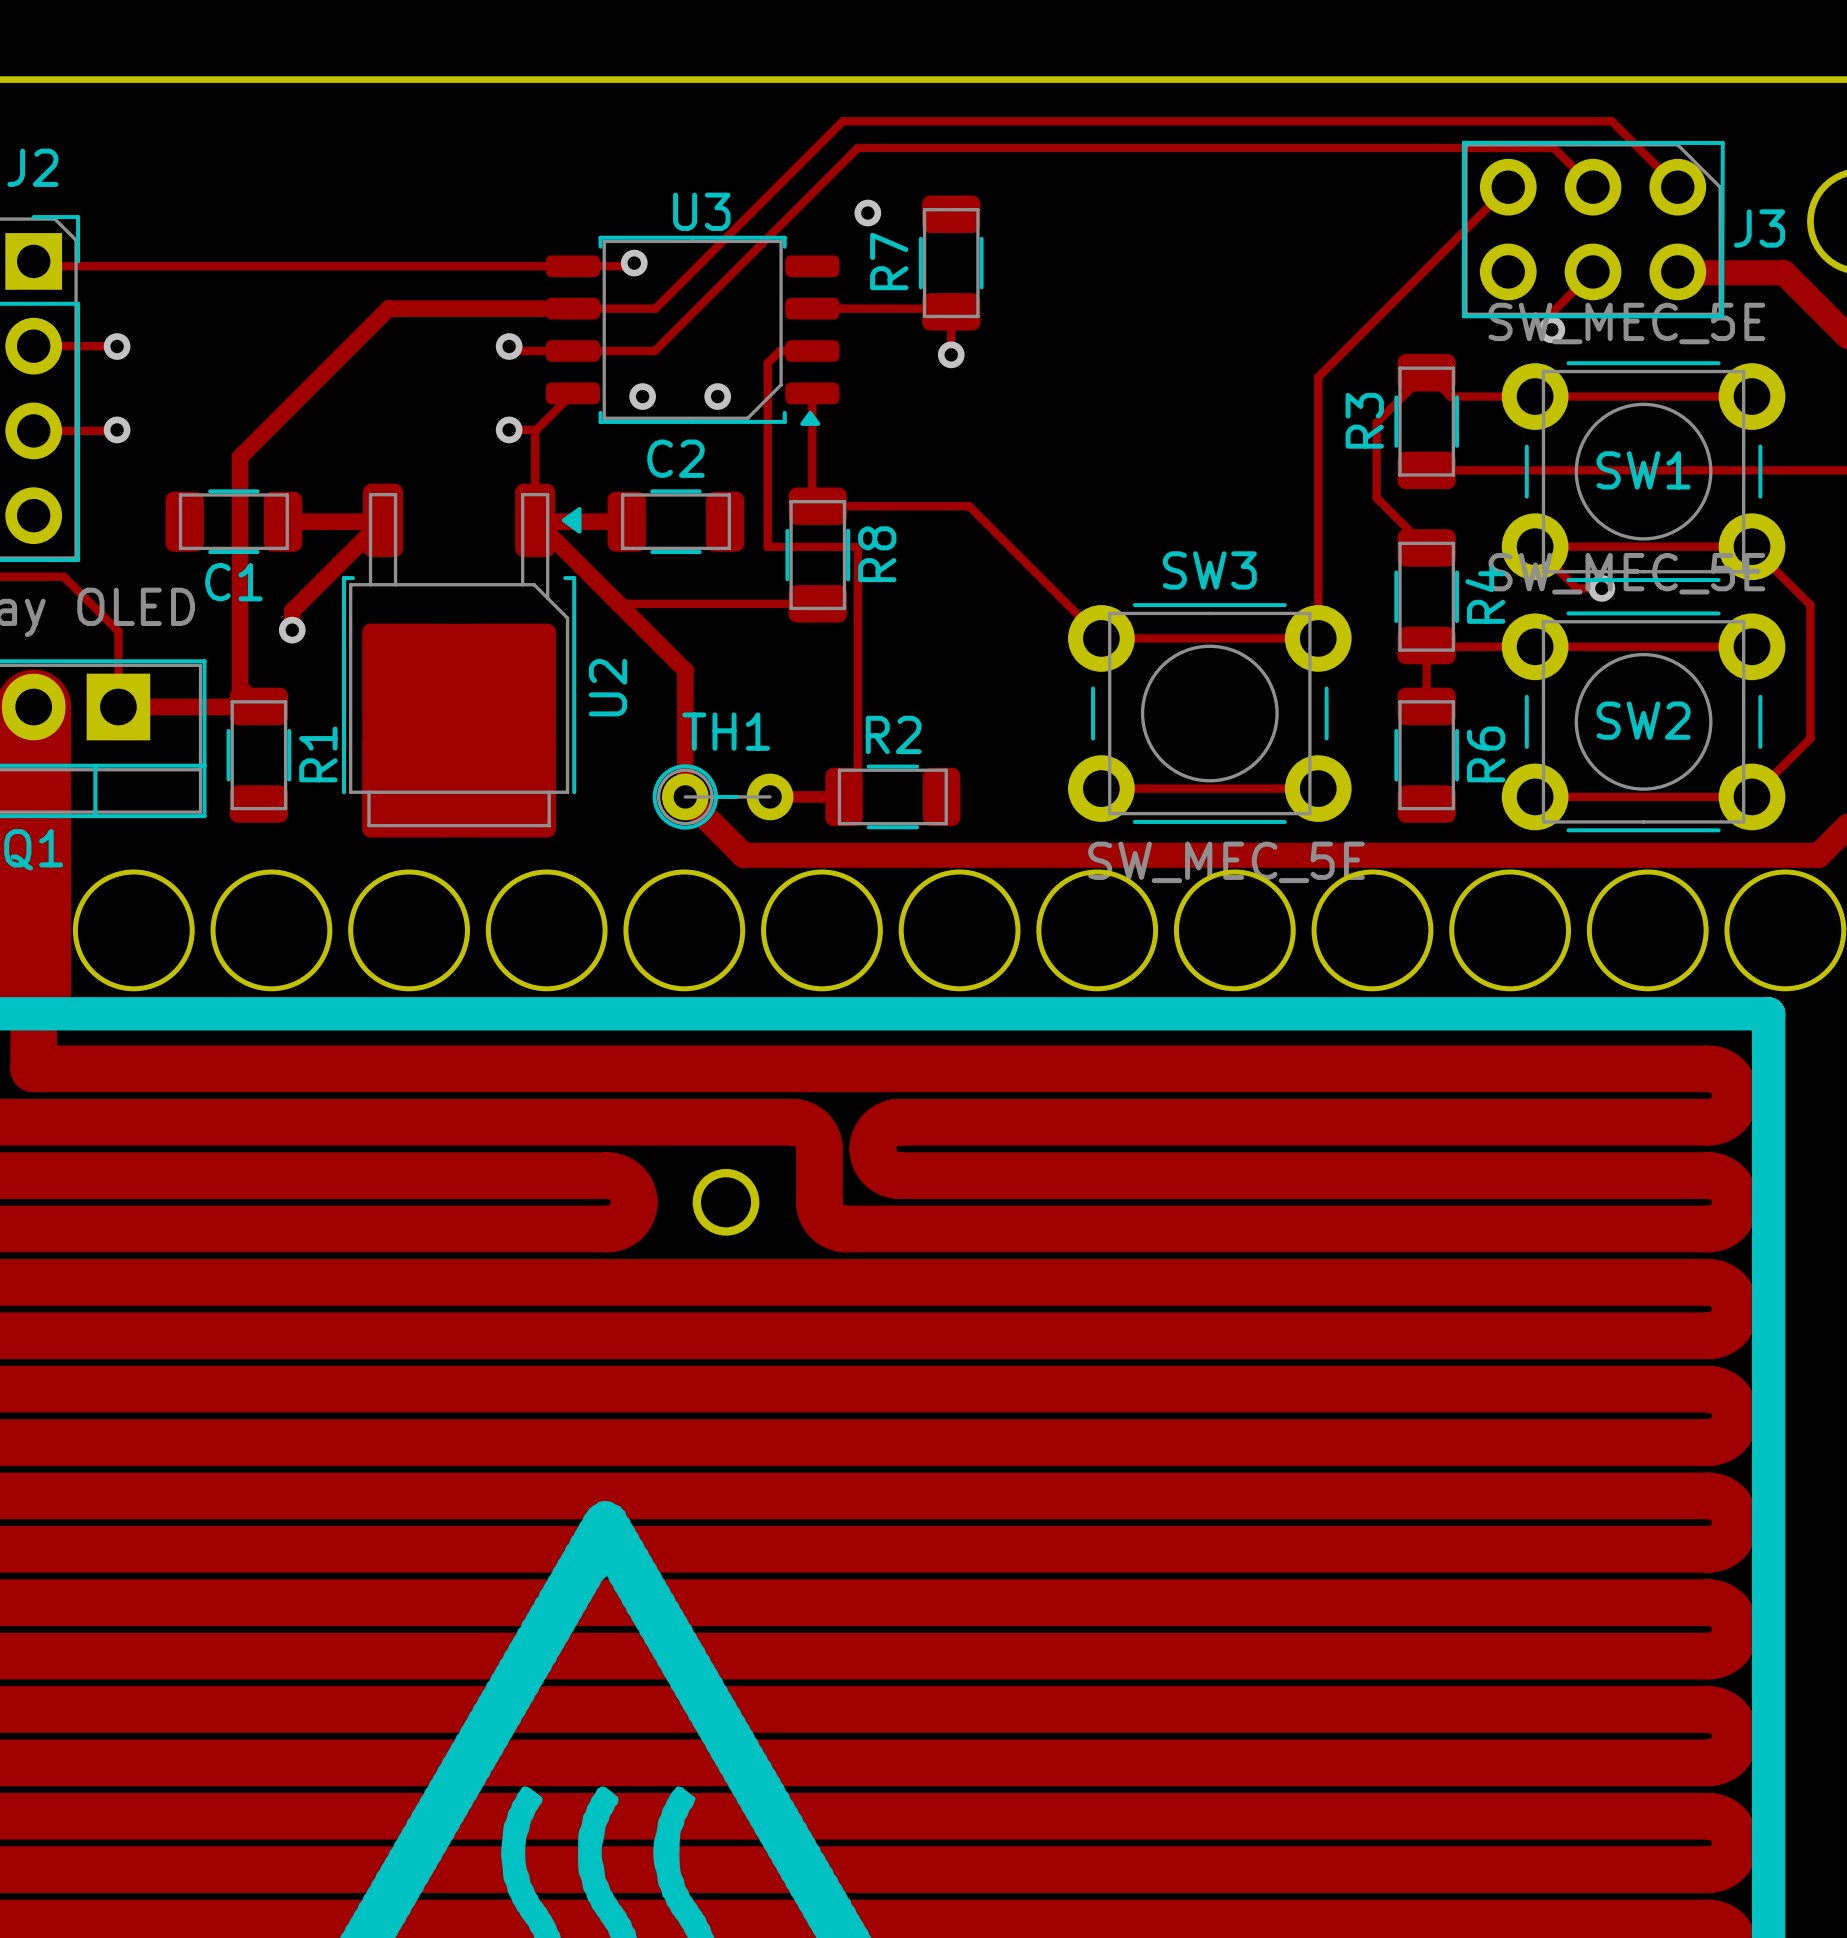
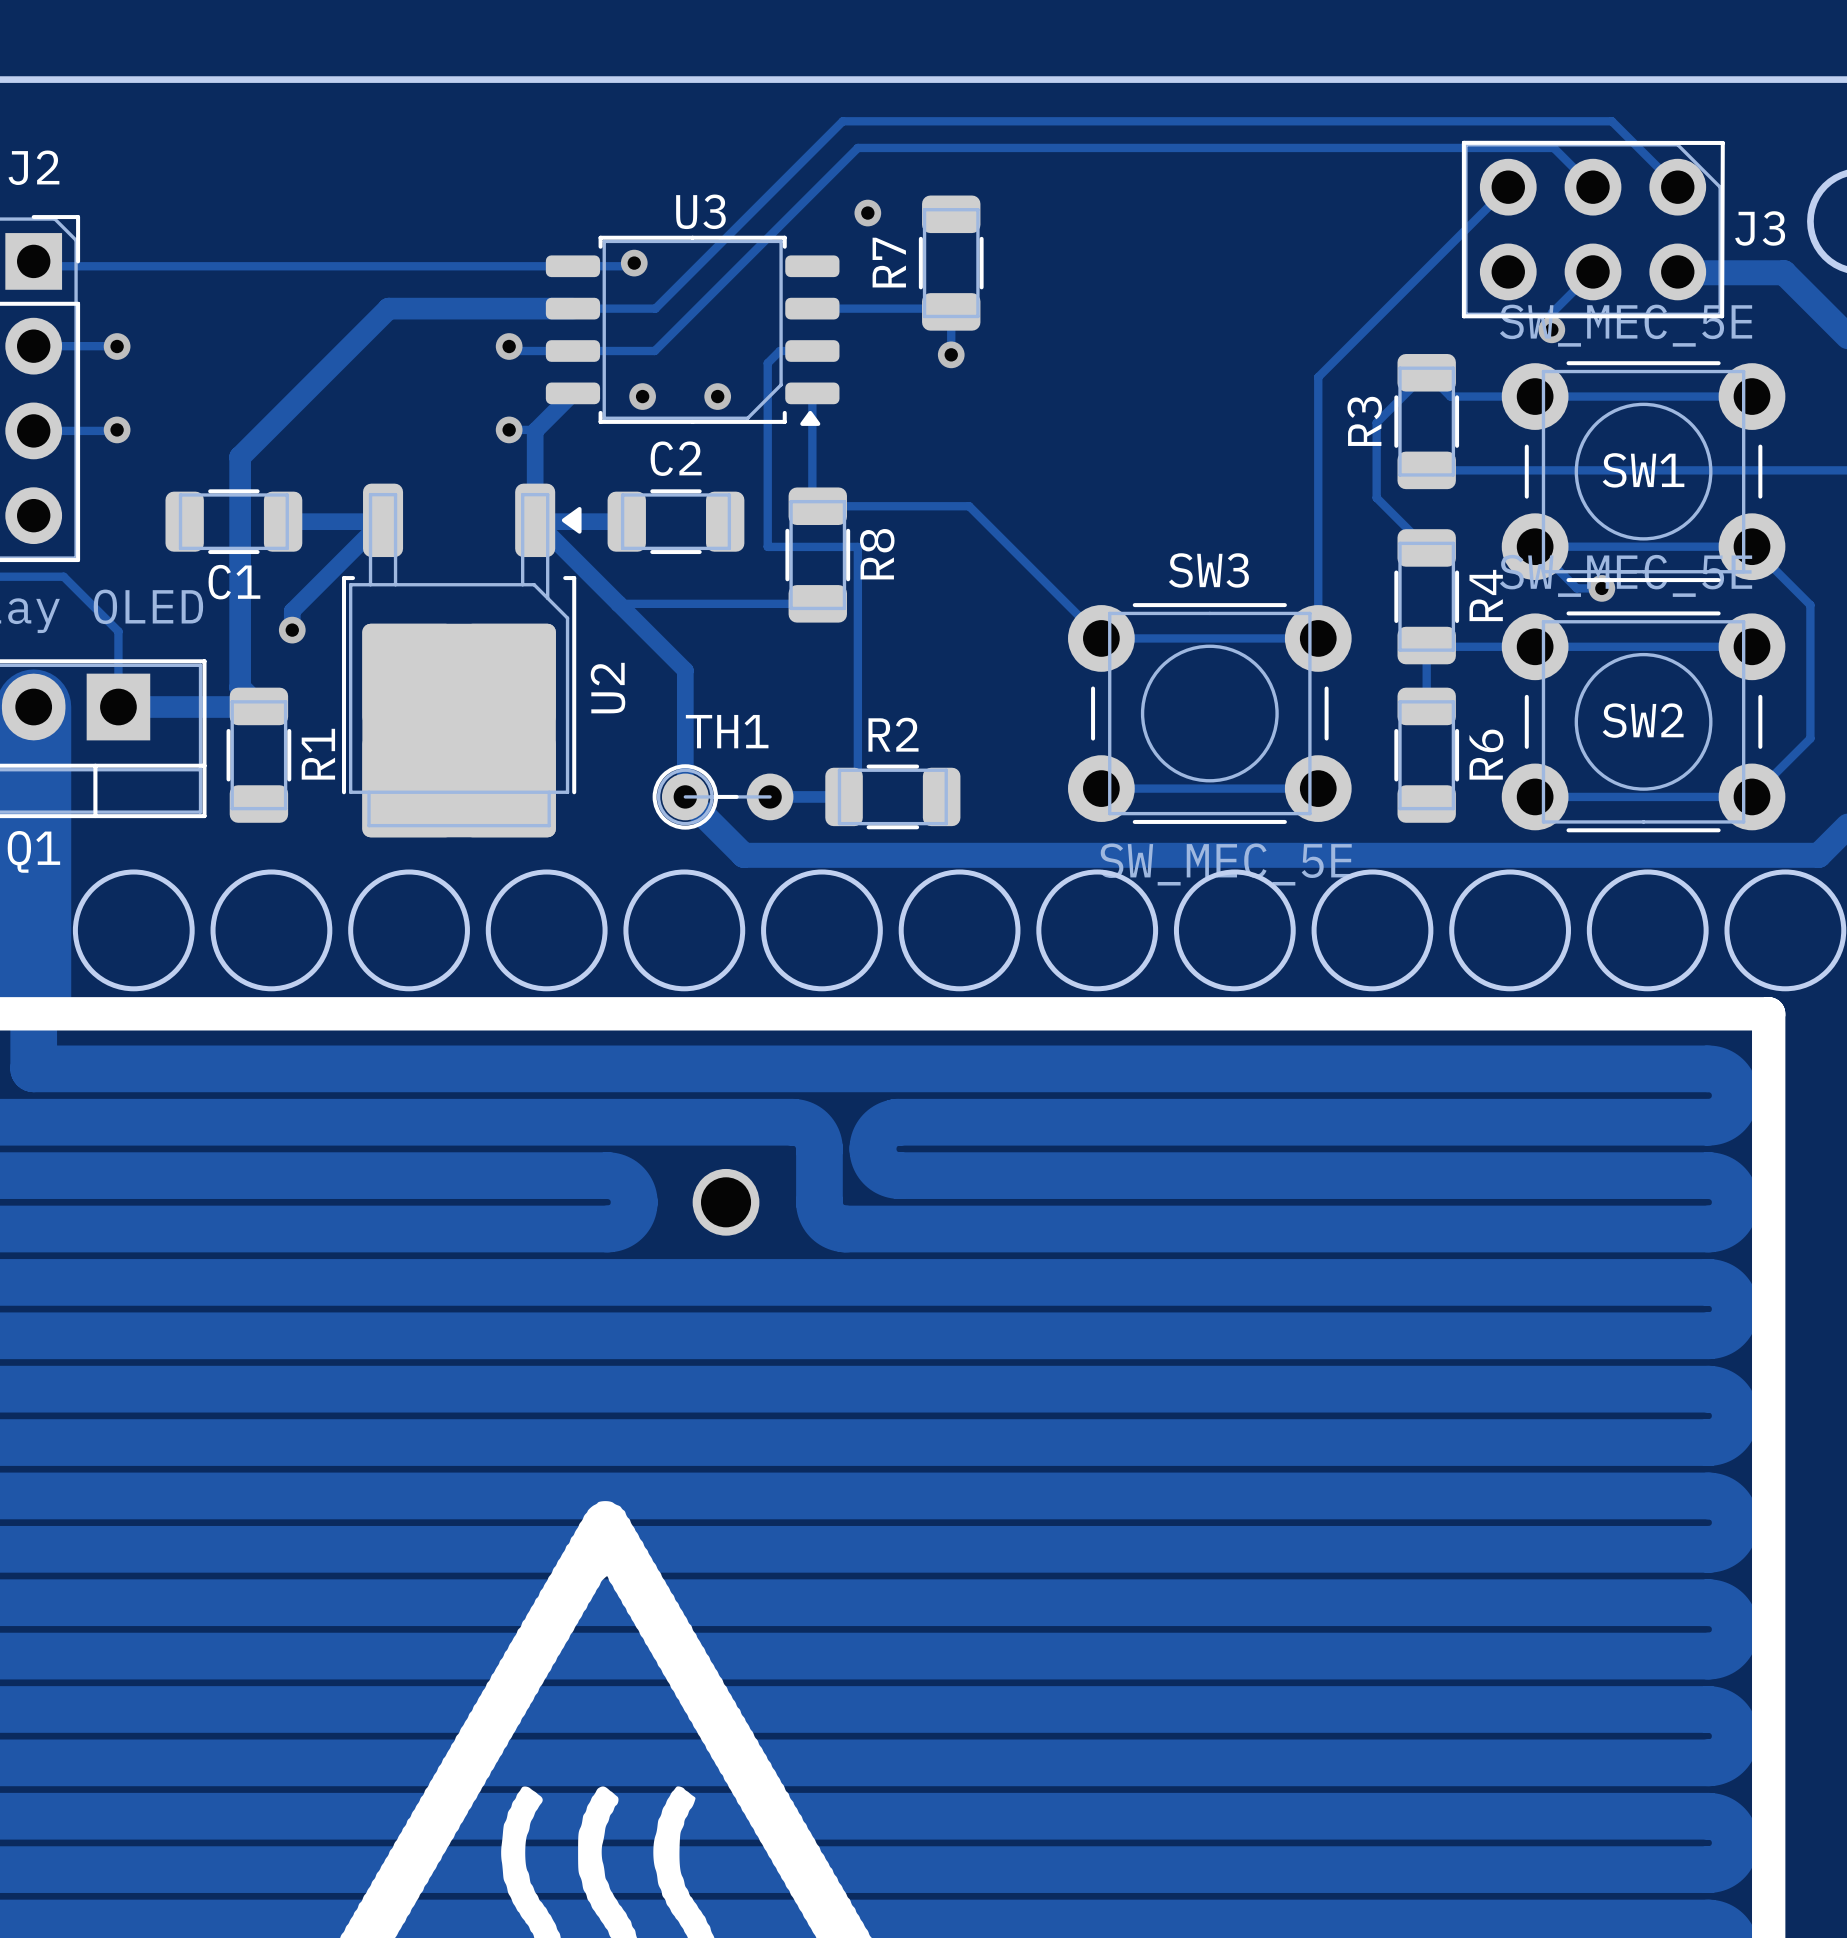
track width: thin (572, 308) (388, 308) (240, 457) (240, 687) (258, 706) -> thick (572, 308) (388, 308) (240, 457) (240, 687) (258, 706)
track width: thin (572, 393) (535, 431) (535, 520) -> thick (572, 393) (535, 431) (535, 520)
track width: thin (118, 707) (258, 707) -> thick (118, 707) (258, 707)

